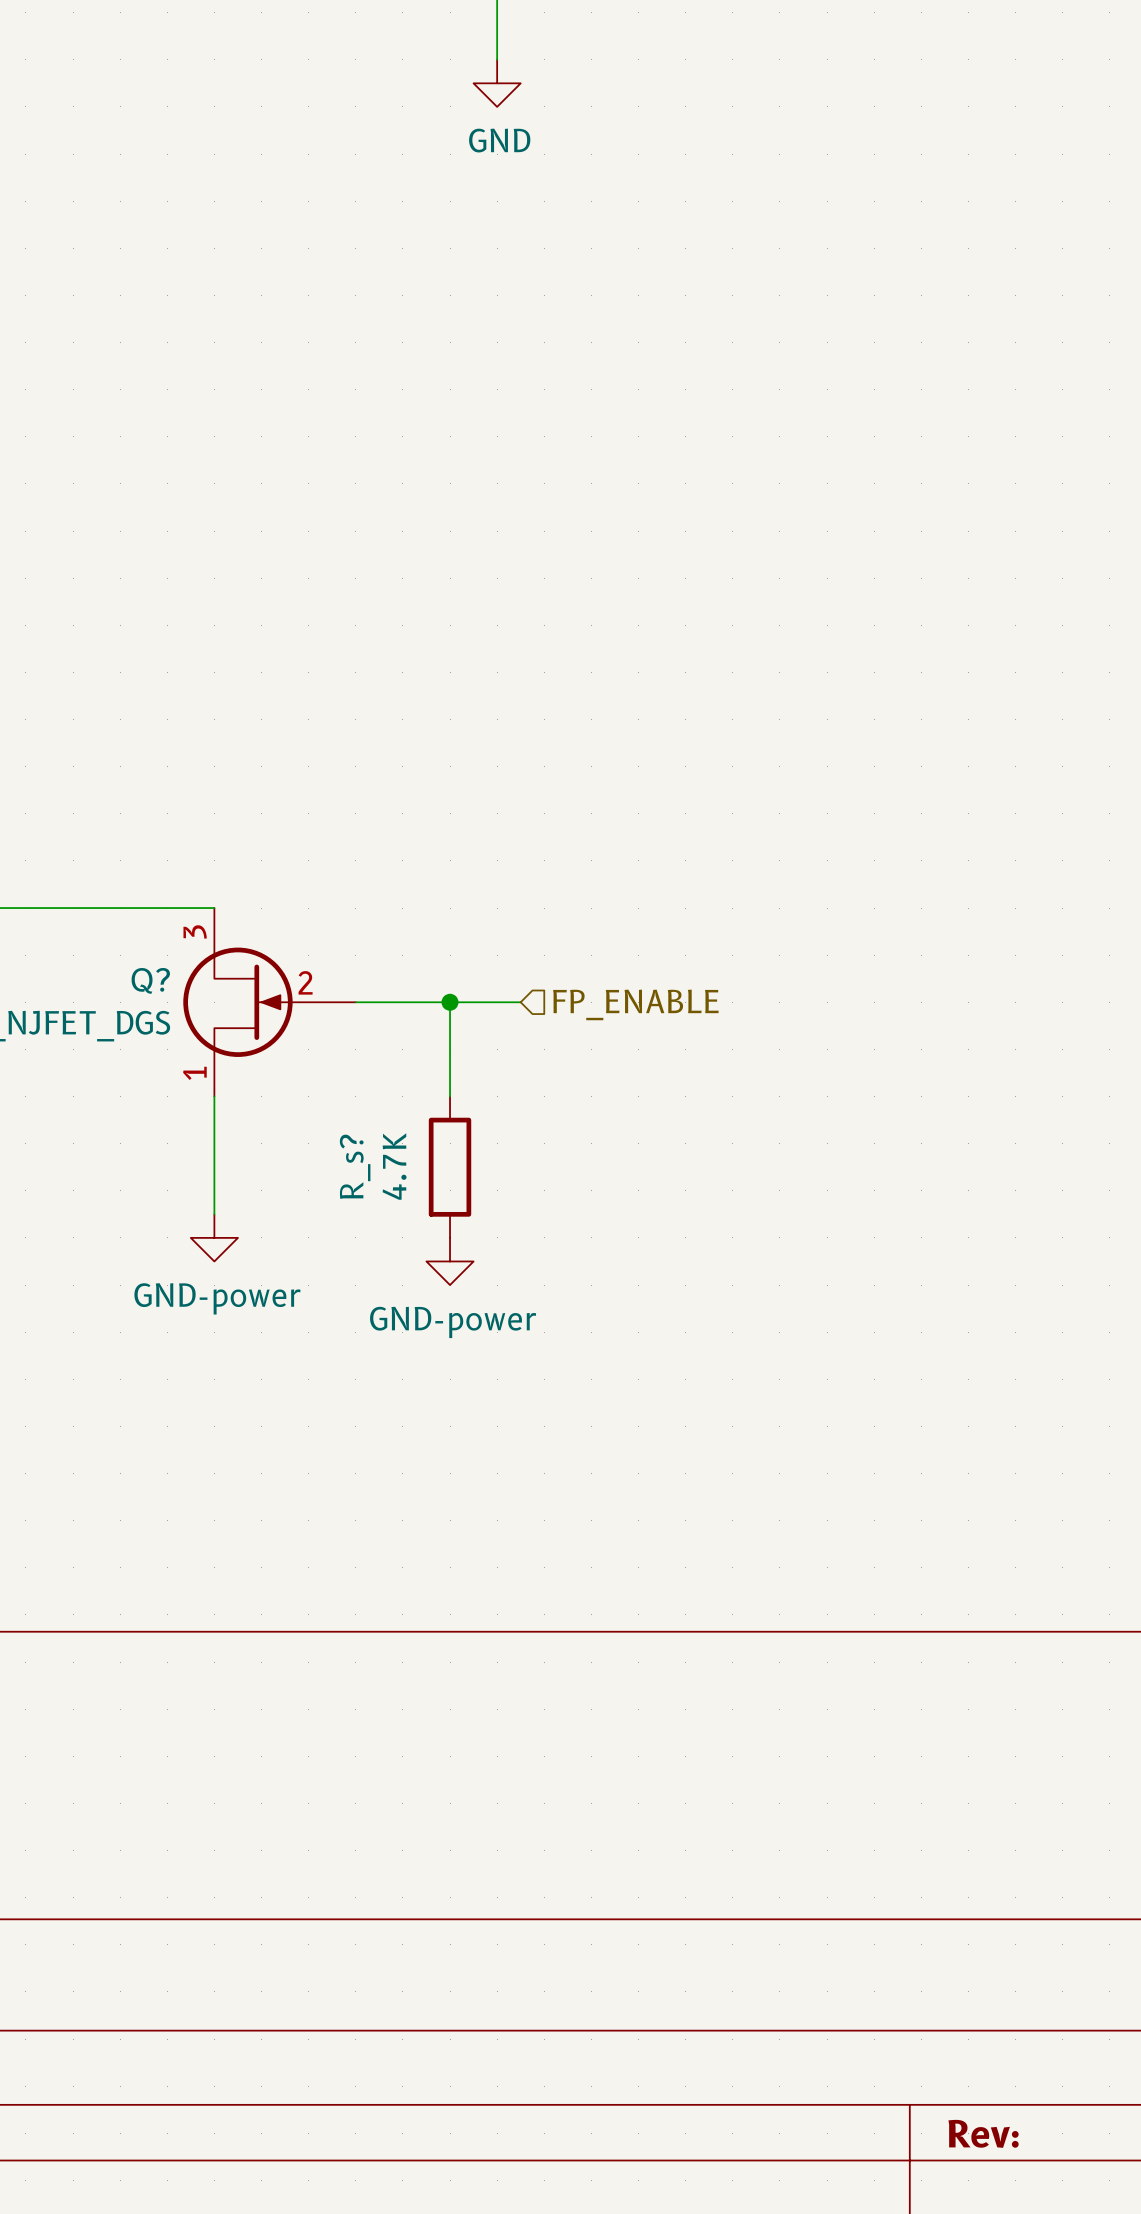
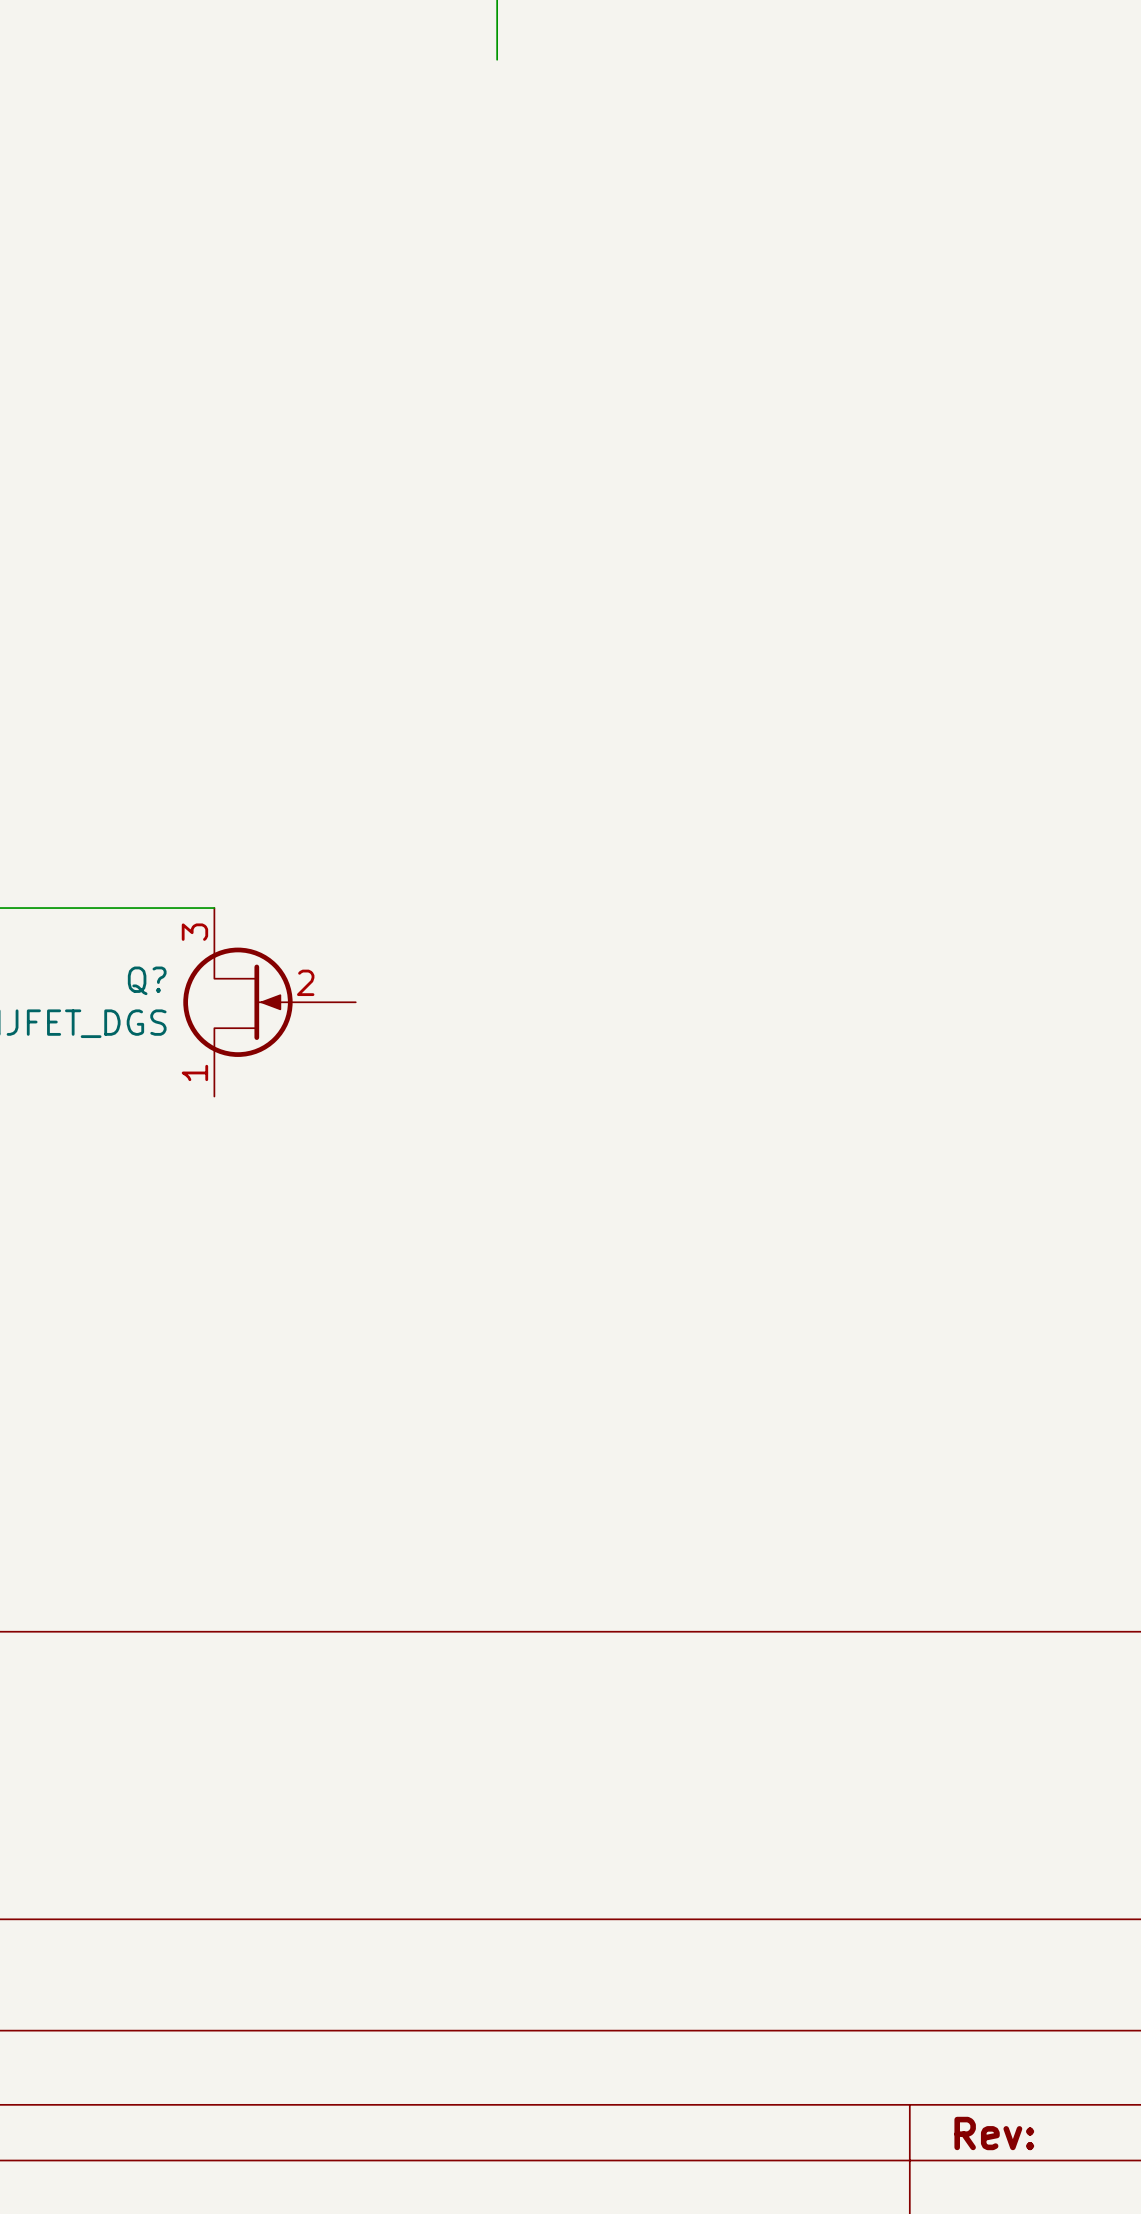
power symbol: GND (497, 83) -> none
wire: (355, 1002) (520, 1002) -> none
wire: (450, 1002) (450, 1096) -> none
junction: (450, 1002) -> none
hierarchical label: FP_ENABLE (635, 1004) -> none
wire: (214, 1096) (214, 1214) -> none
R_s?: 4.7K (450, 1167) -> none
power symbol: GND-power (214, 1237) -> none
power symbol: GND-power (450, 1261) -> none

